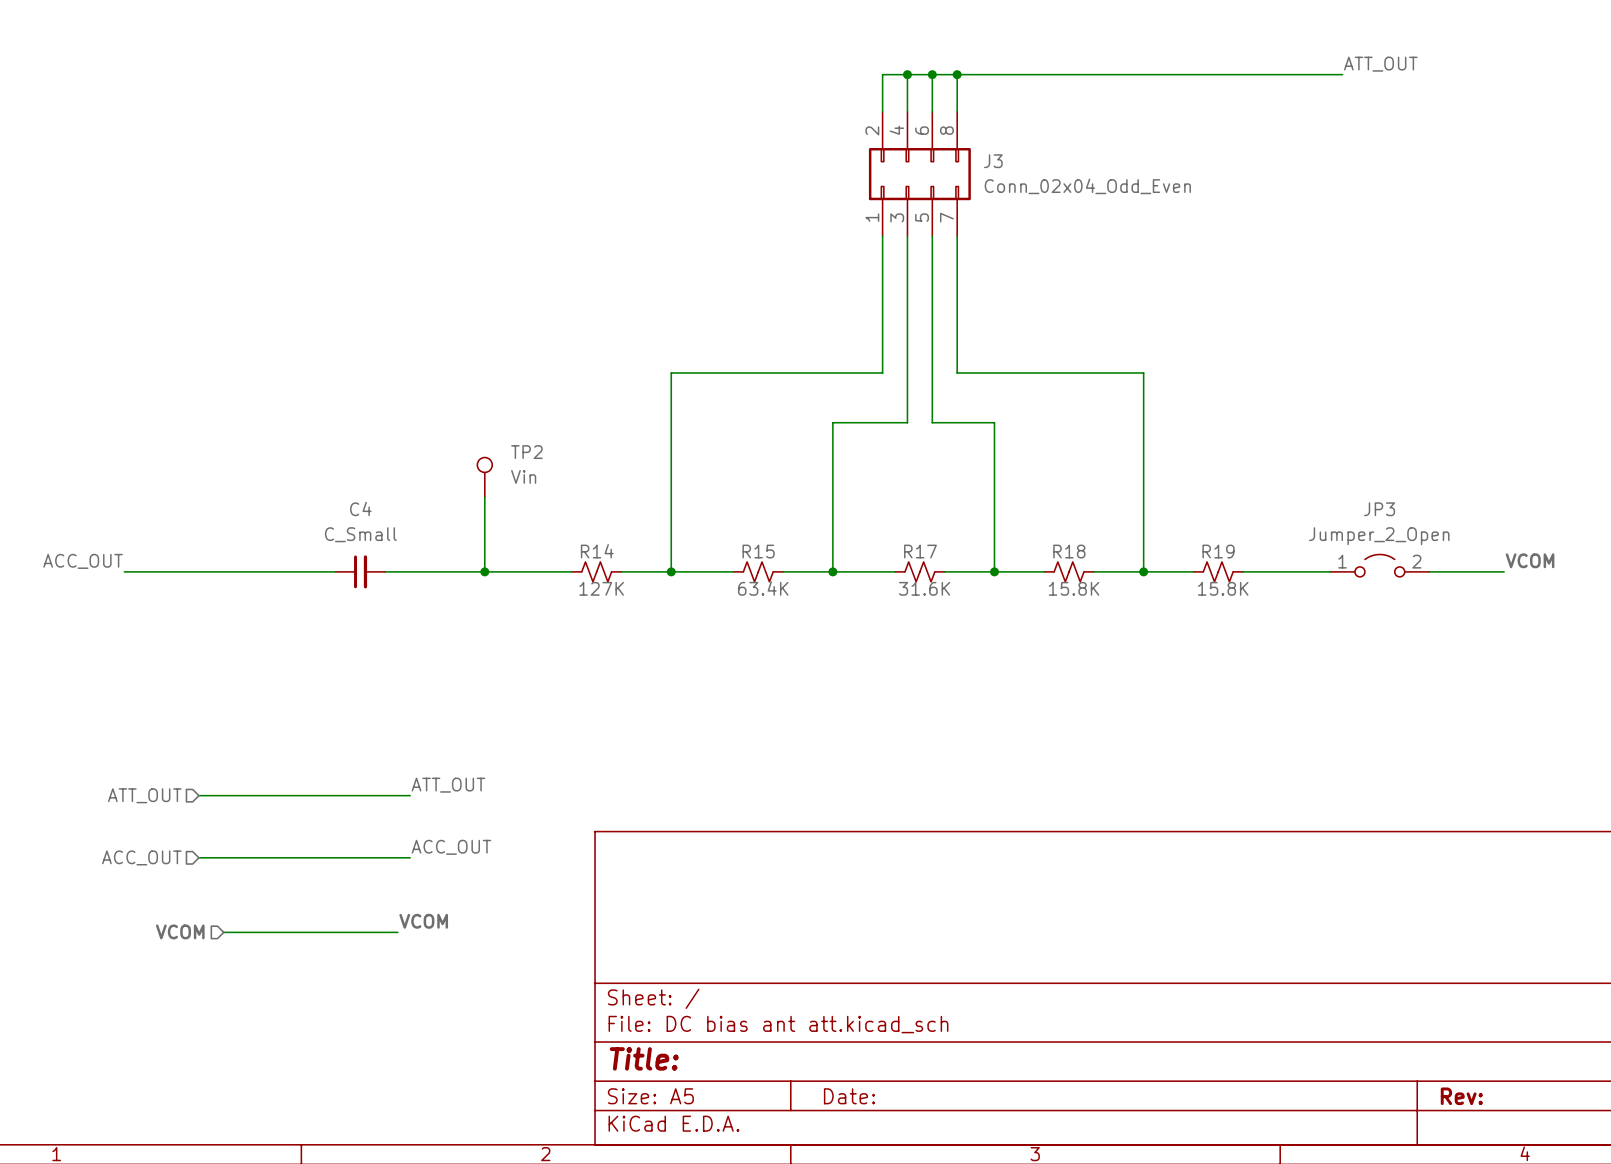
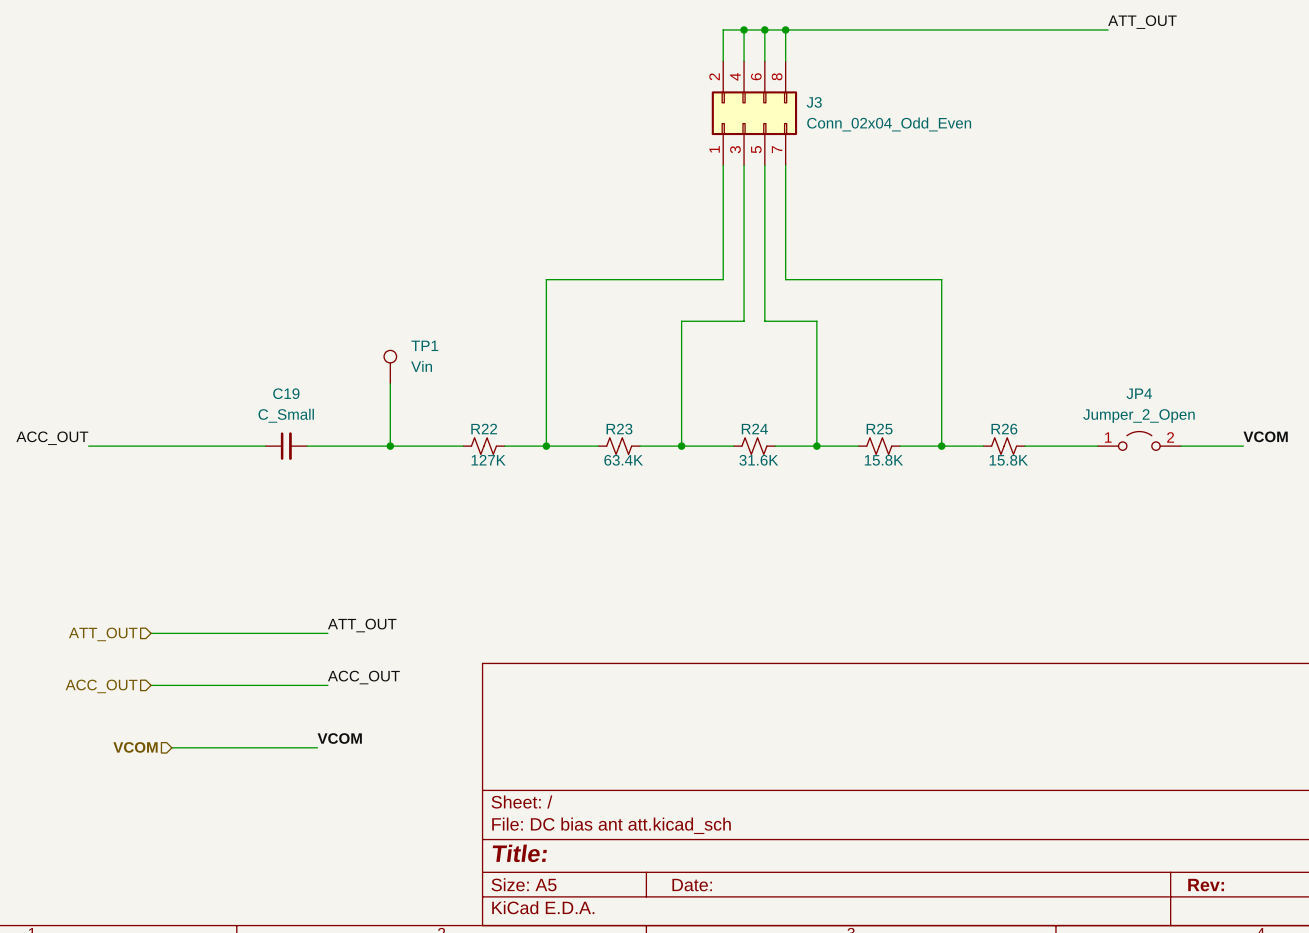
TP2 name: TP2 (526, 452) -> TP1 (424, 345)
C4 name: C4 (360, 508) -> C19 (286, 393)
JP3 name: JP3 (1379, 509) -> JP4 (1139, 393)
R14 name: R14 (597, 551) -> R22 (484, 429)
R15 name: R15 (758, 551) -> R23 (619, 429)
R17 name: R17 (920, 551) -> R24 (754, 429)
R18 name: R18 (1069, 551) -> R25 (879, 429)
R19 name: R19 (1218, 551) -> R26 (1004, 429)

